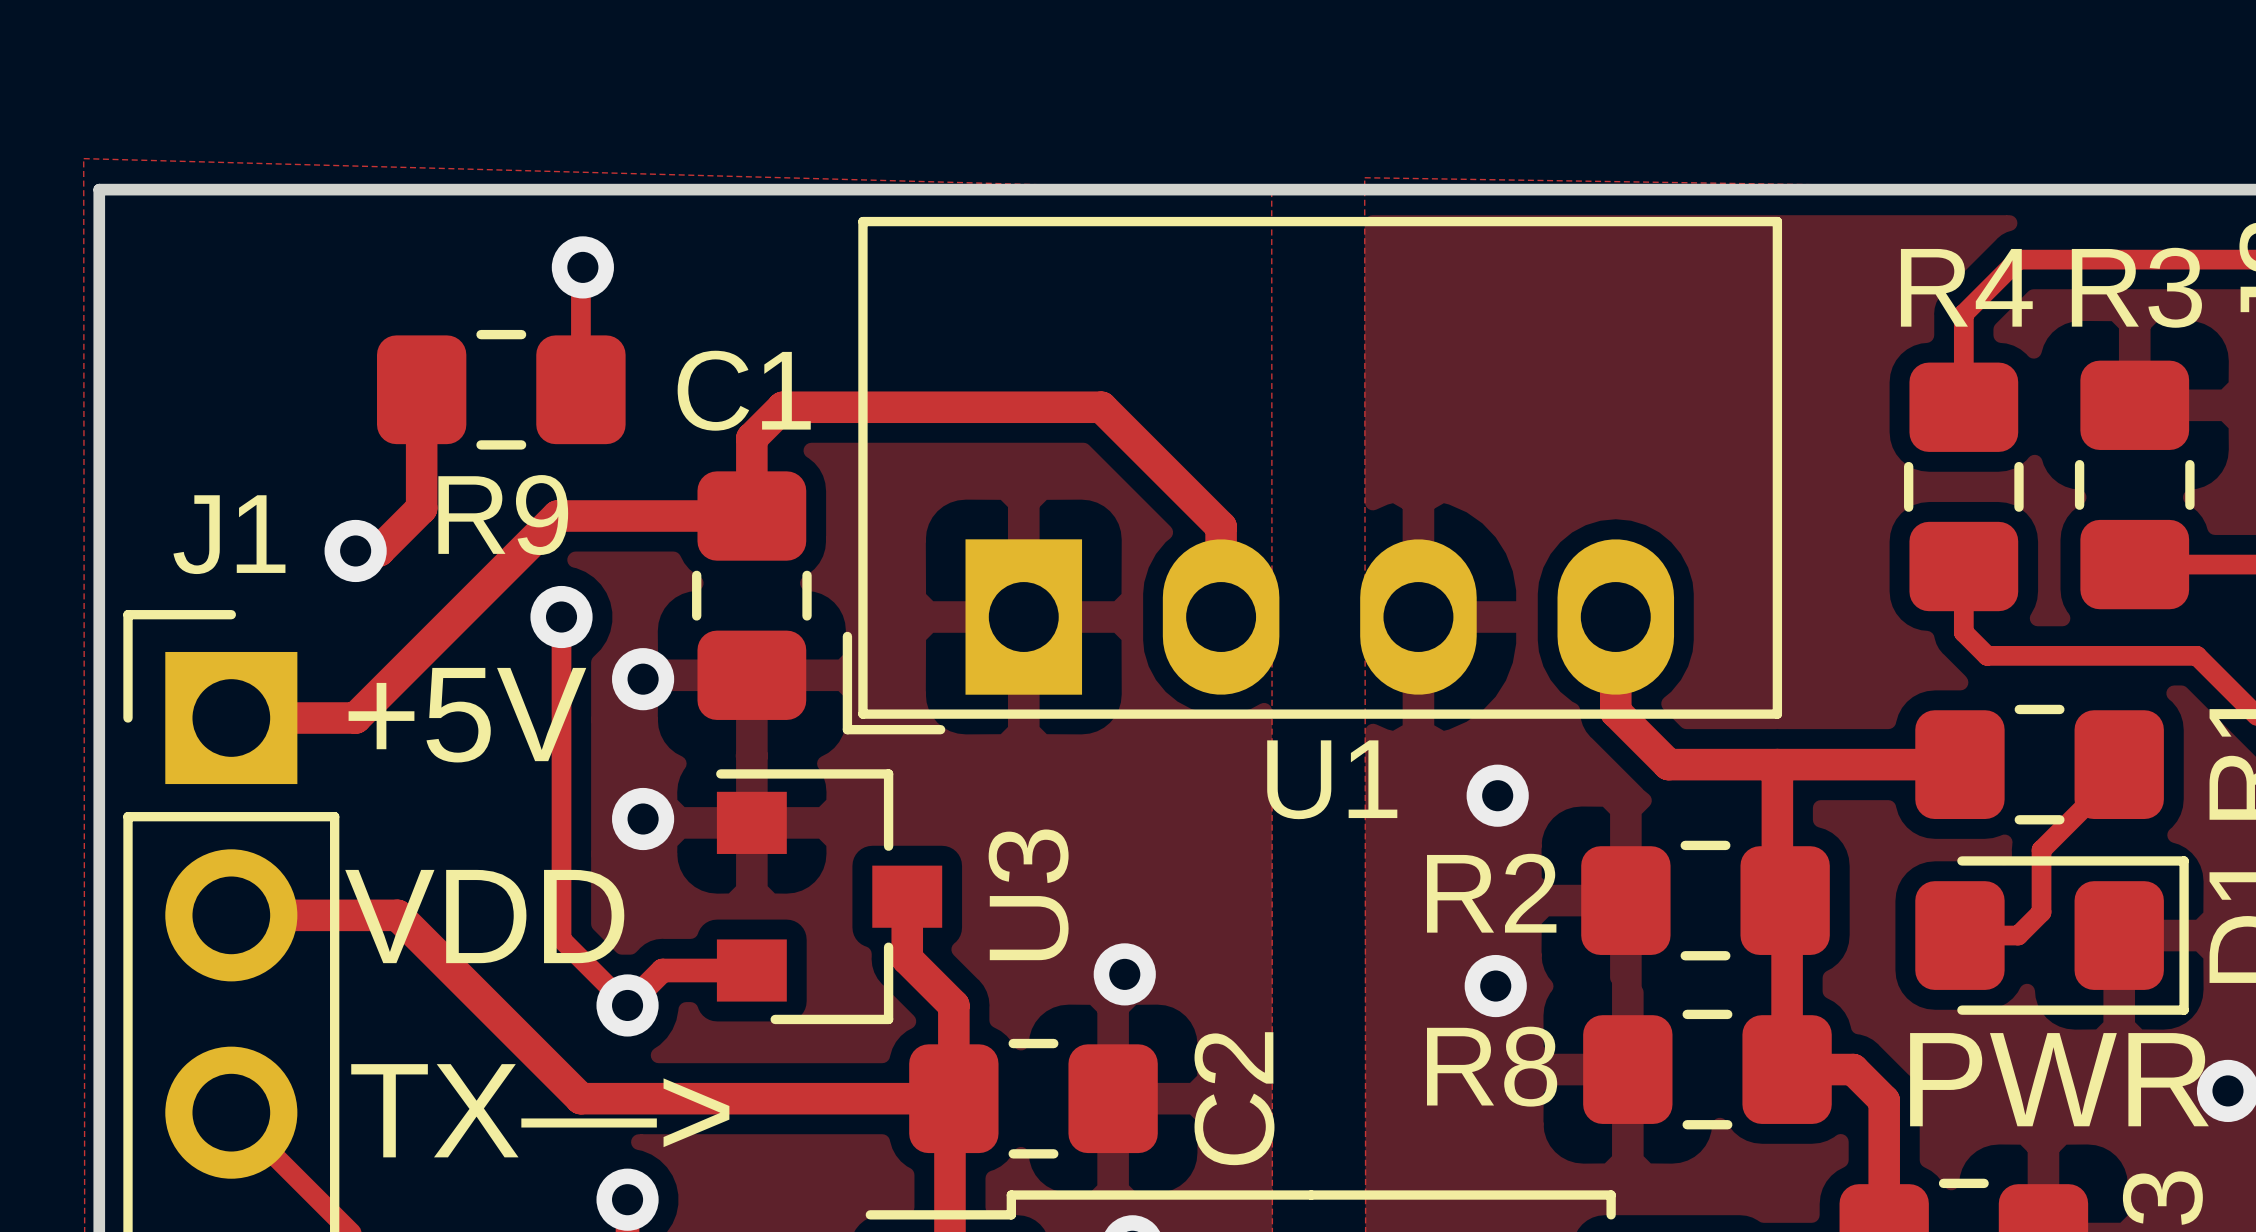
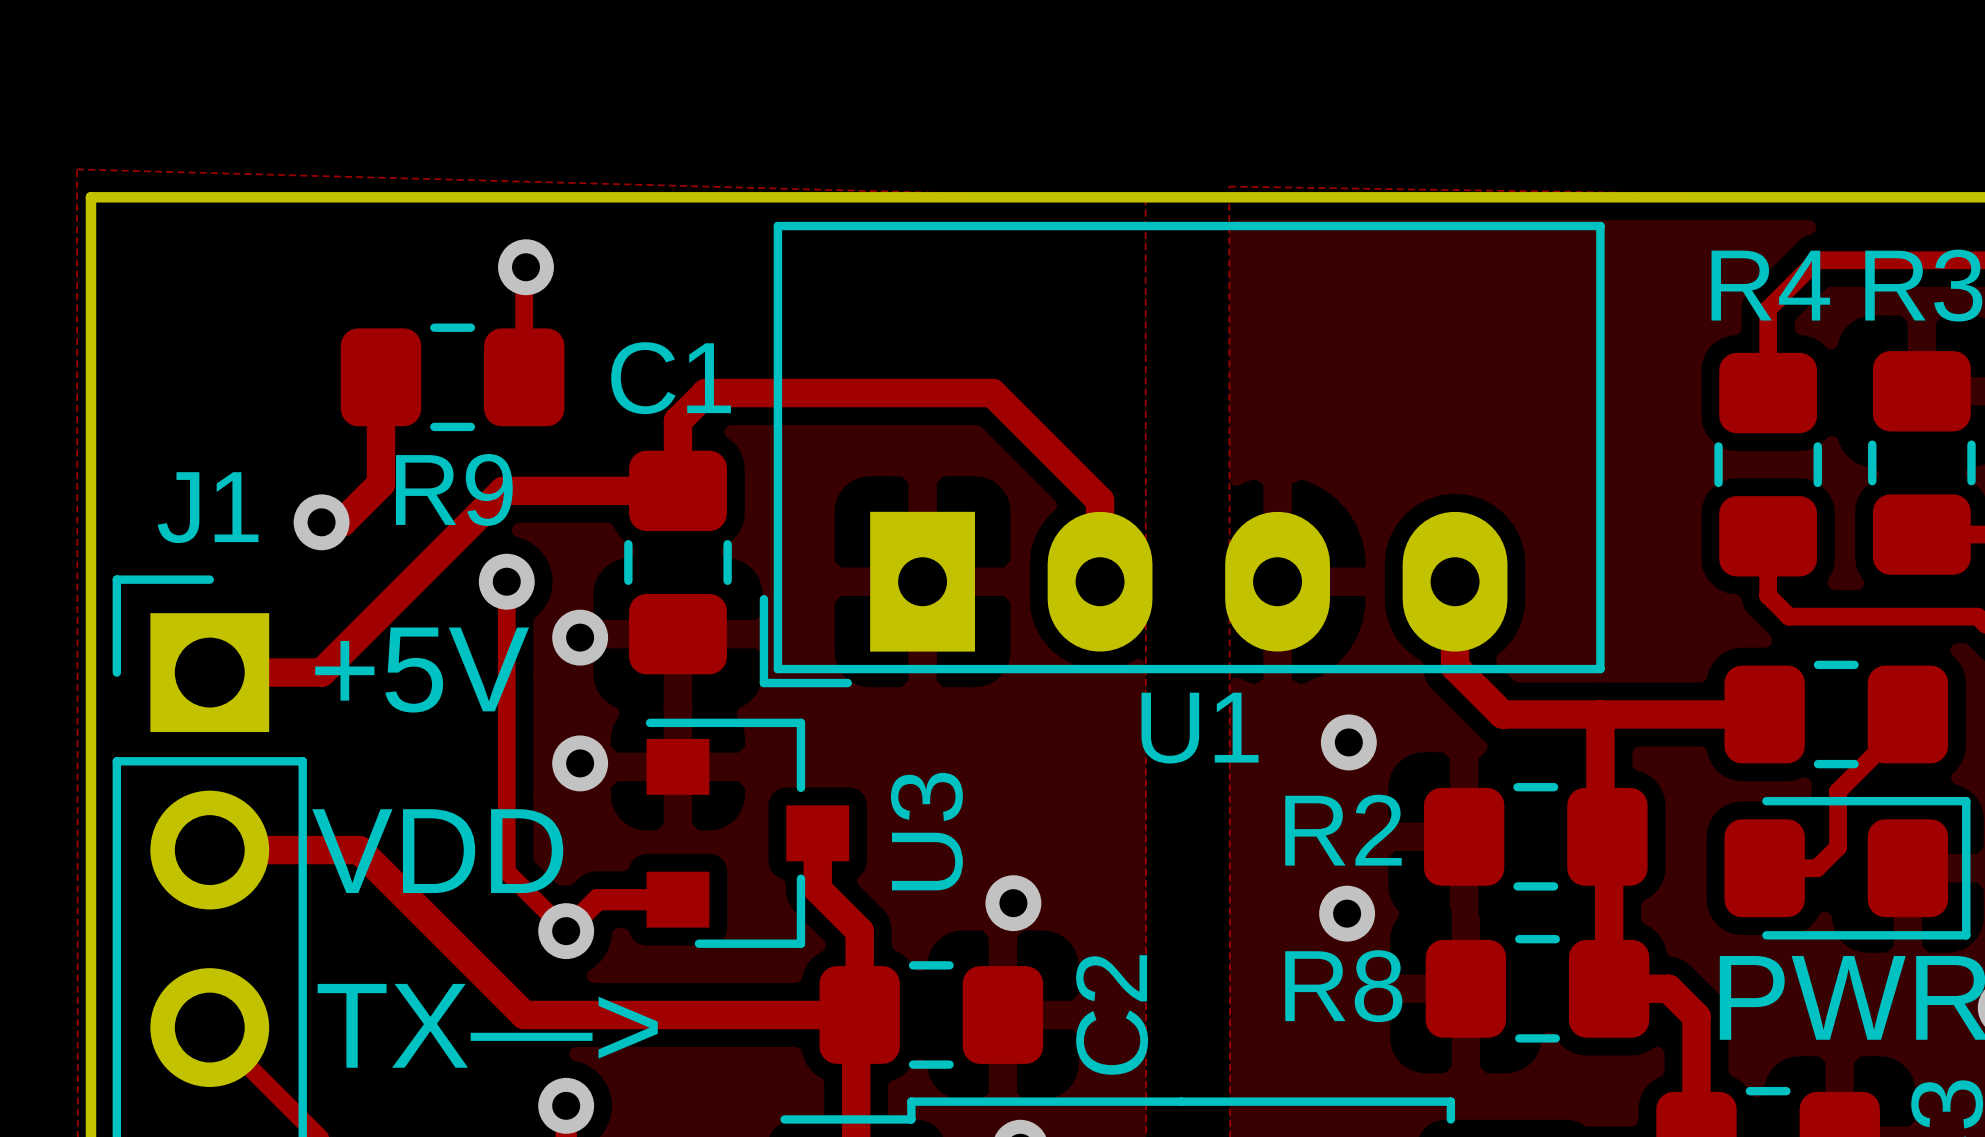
U1 footprint: [842, 216, 1783, 735] -> [759, 221, 1605, 688]

